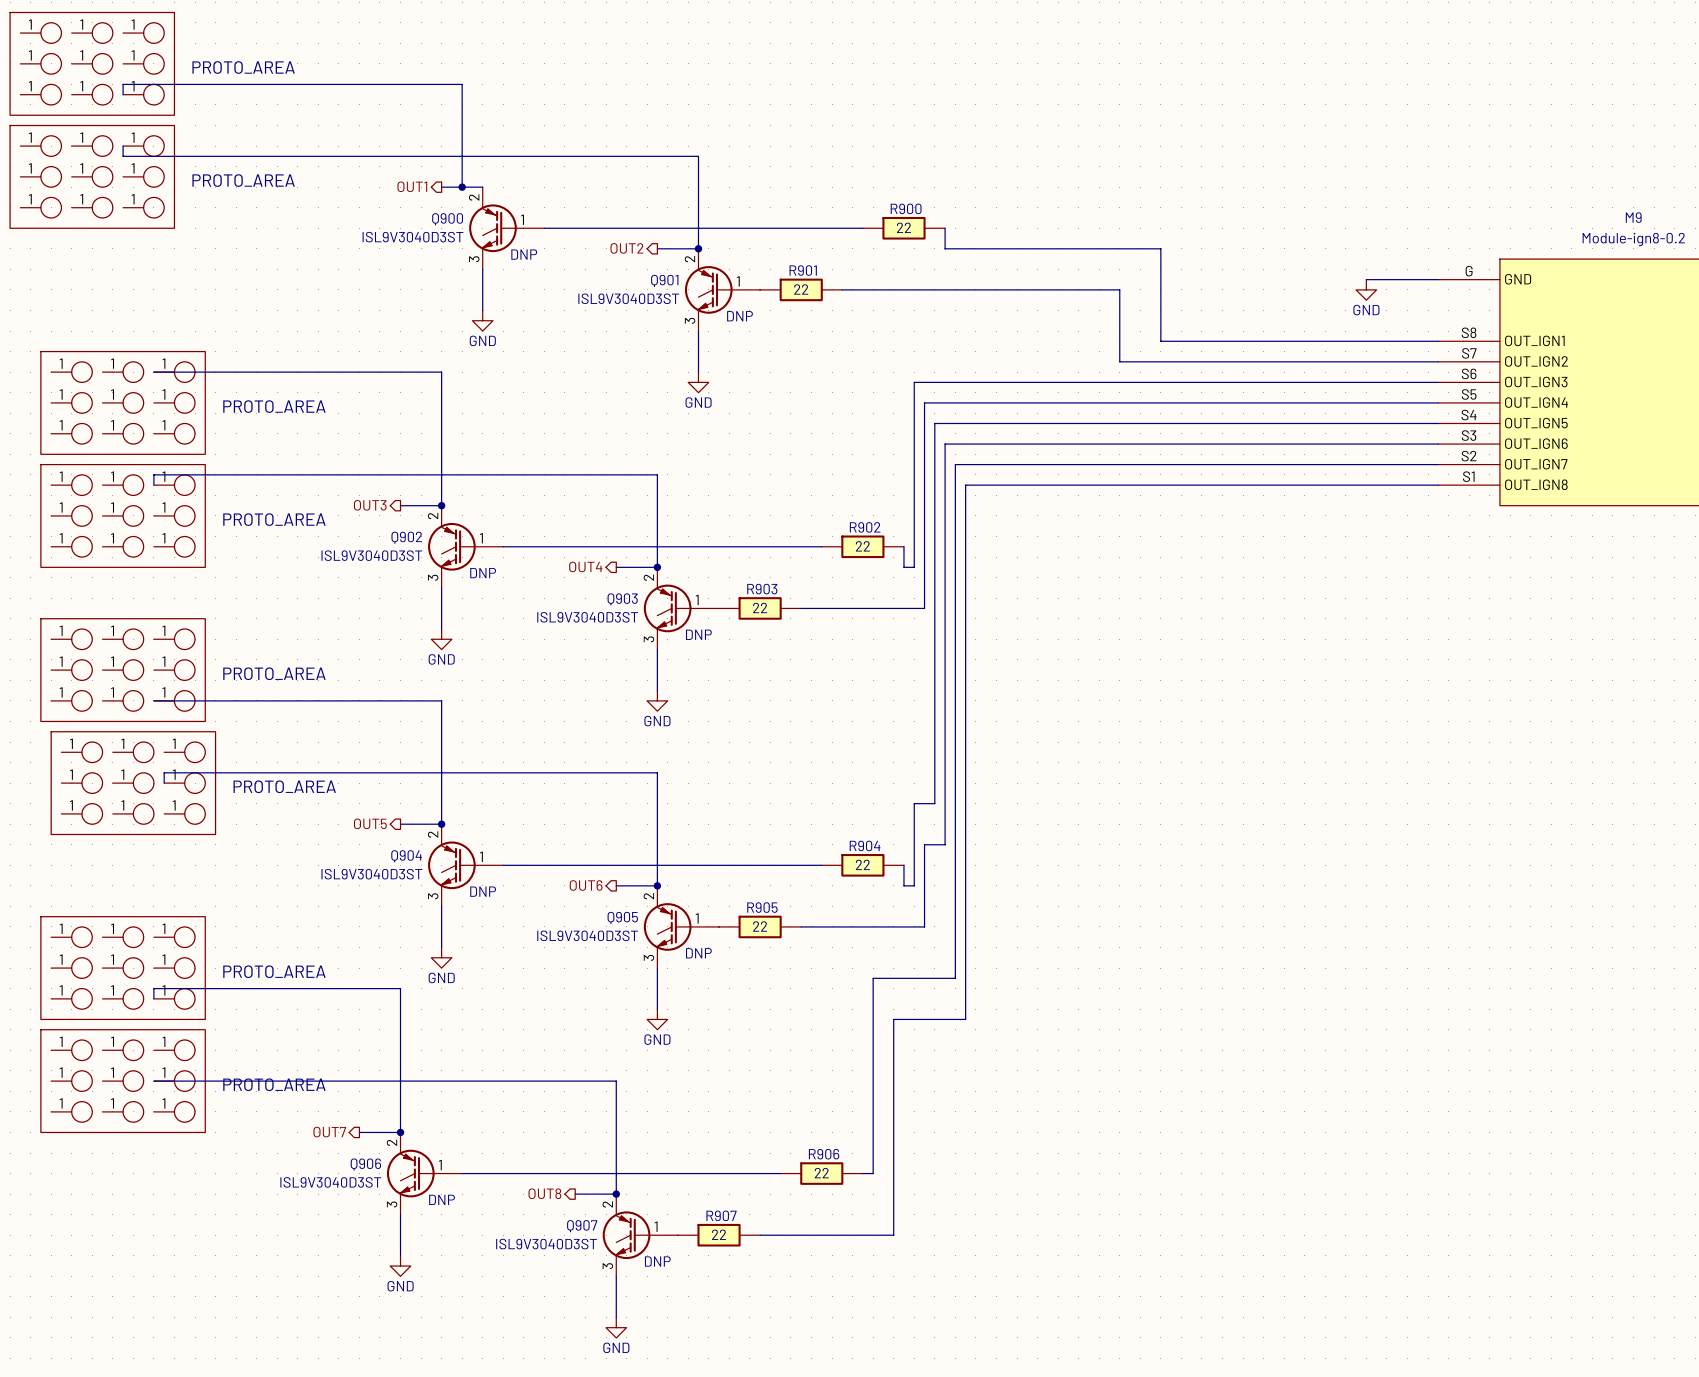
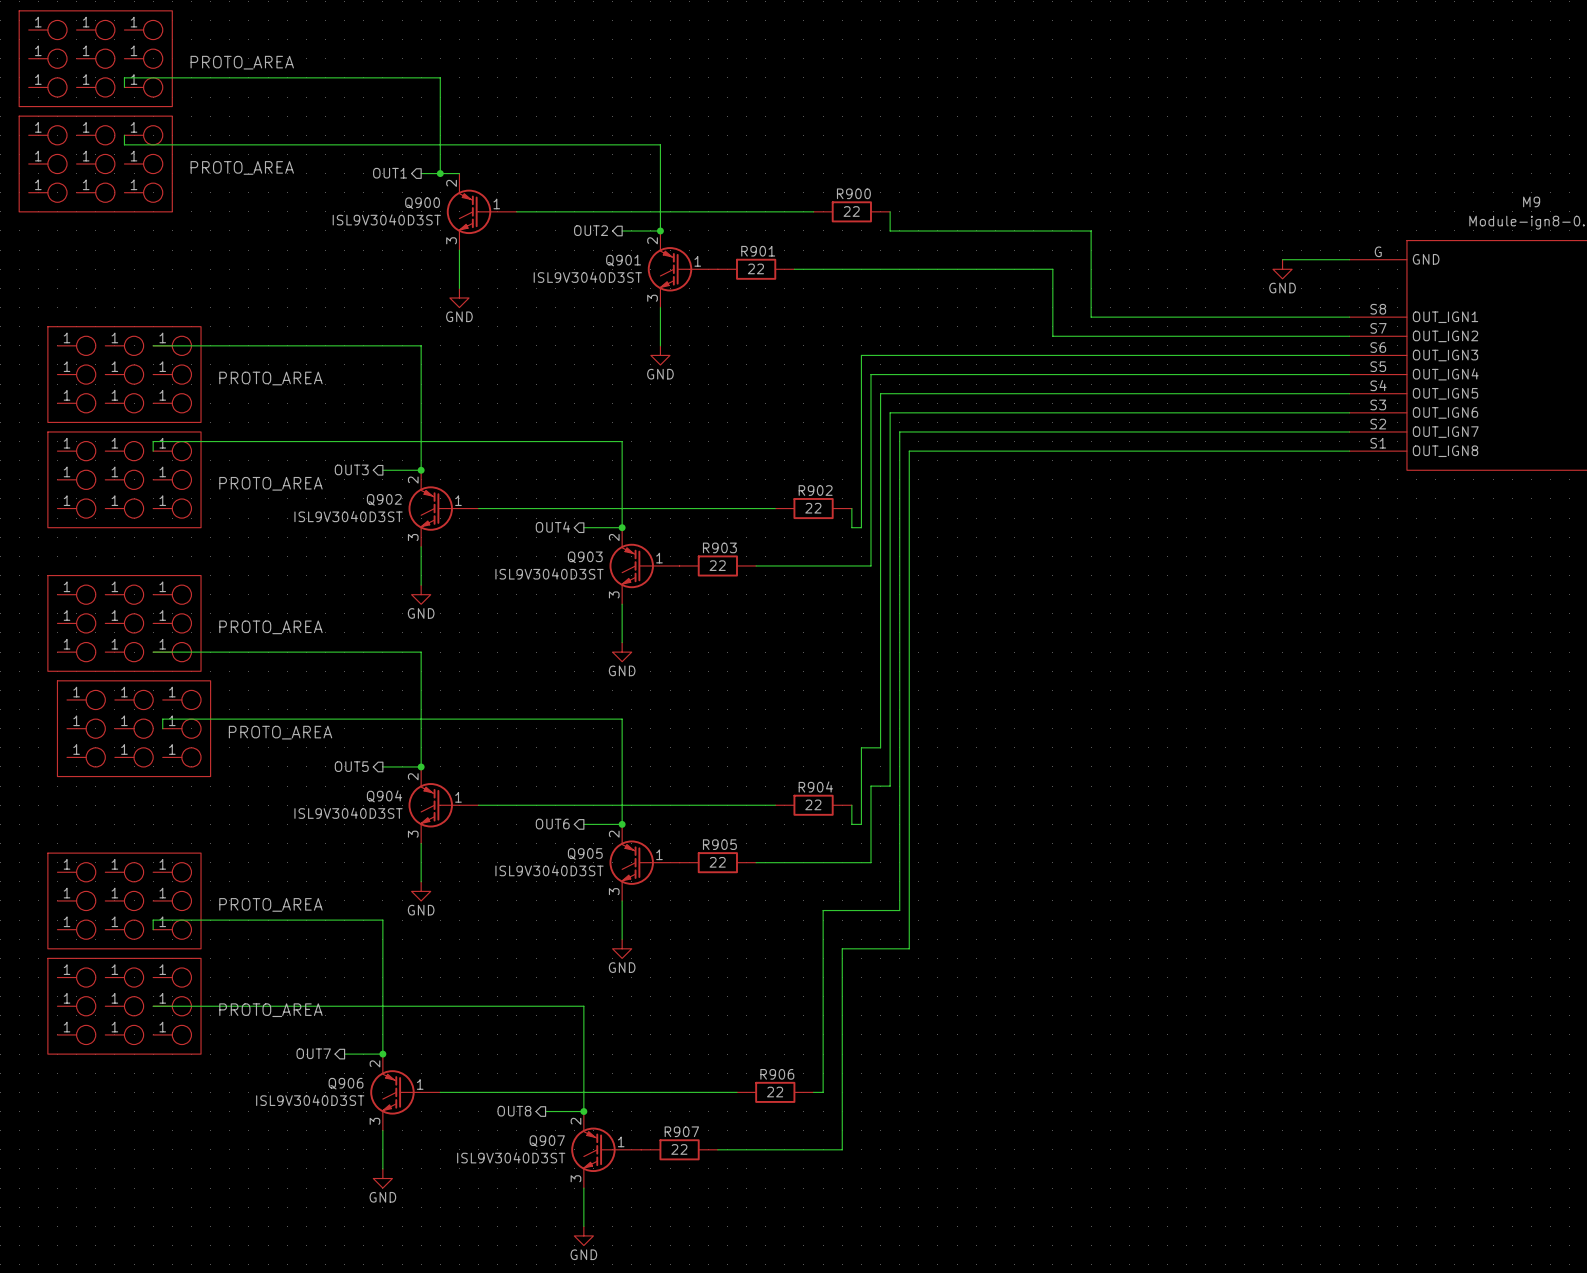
Q900 text: DNP (524, 254) -> none
Q901 text: DNP (740, 316) -> none
Q902 text: DNP (483, 573) -> none
Q903 text: DNP (698, 634) -> none
Q904 text: DNP (483, 891) -> none
Q905 text: DNP (698, 953) -> none
Q906 text: DNP (442, 1199) -> none
Q907 text: DNP (657, 1261) -> none

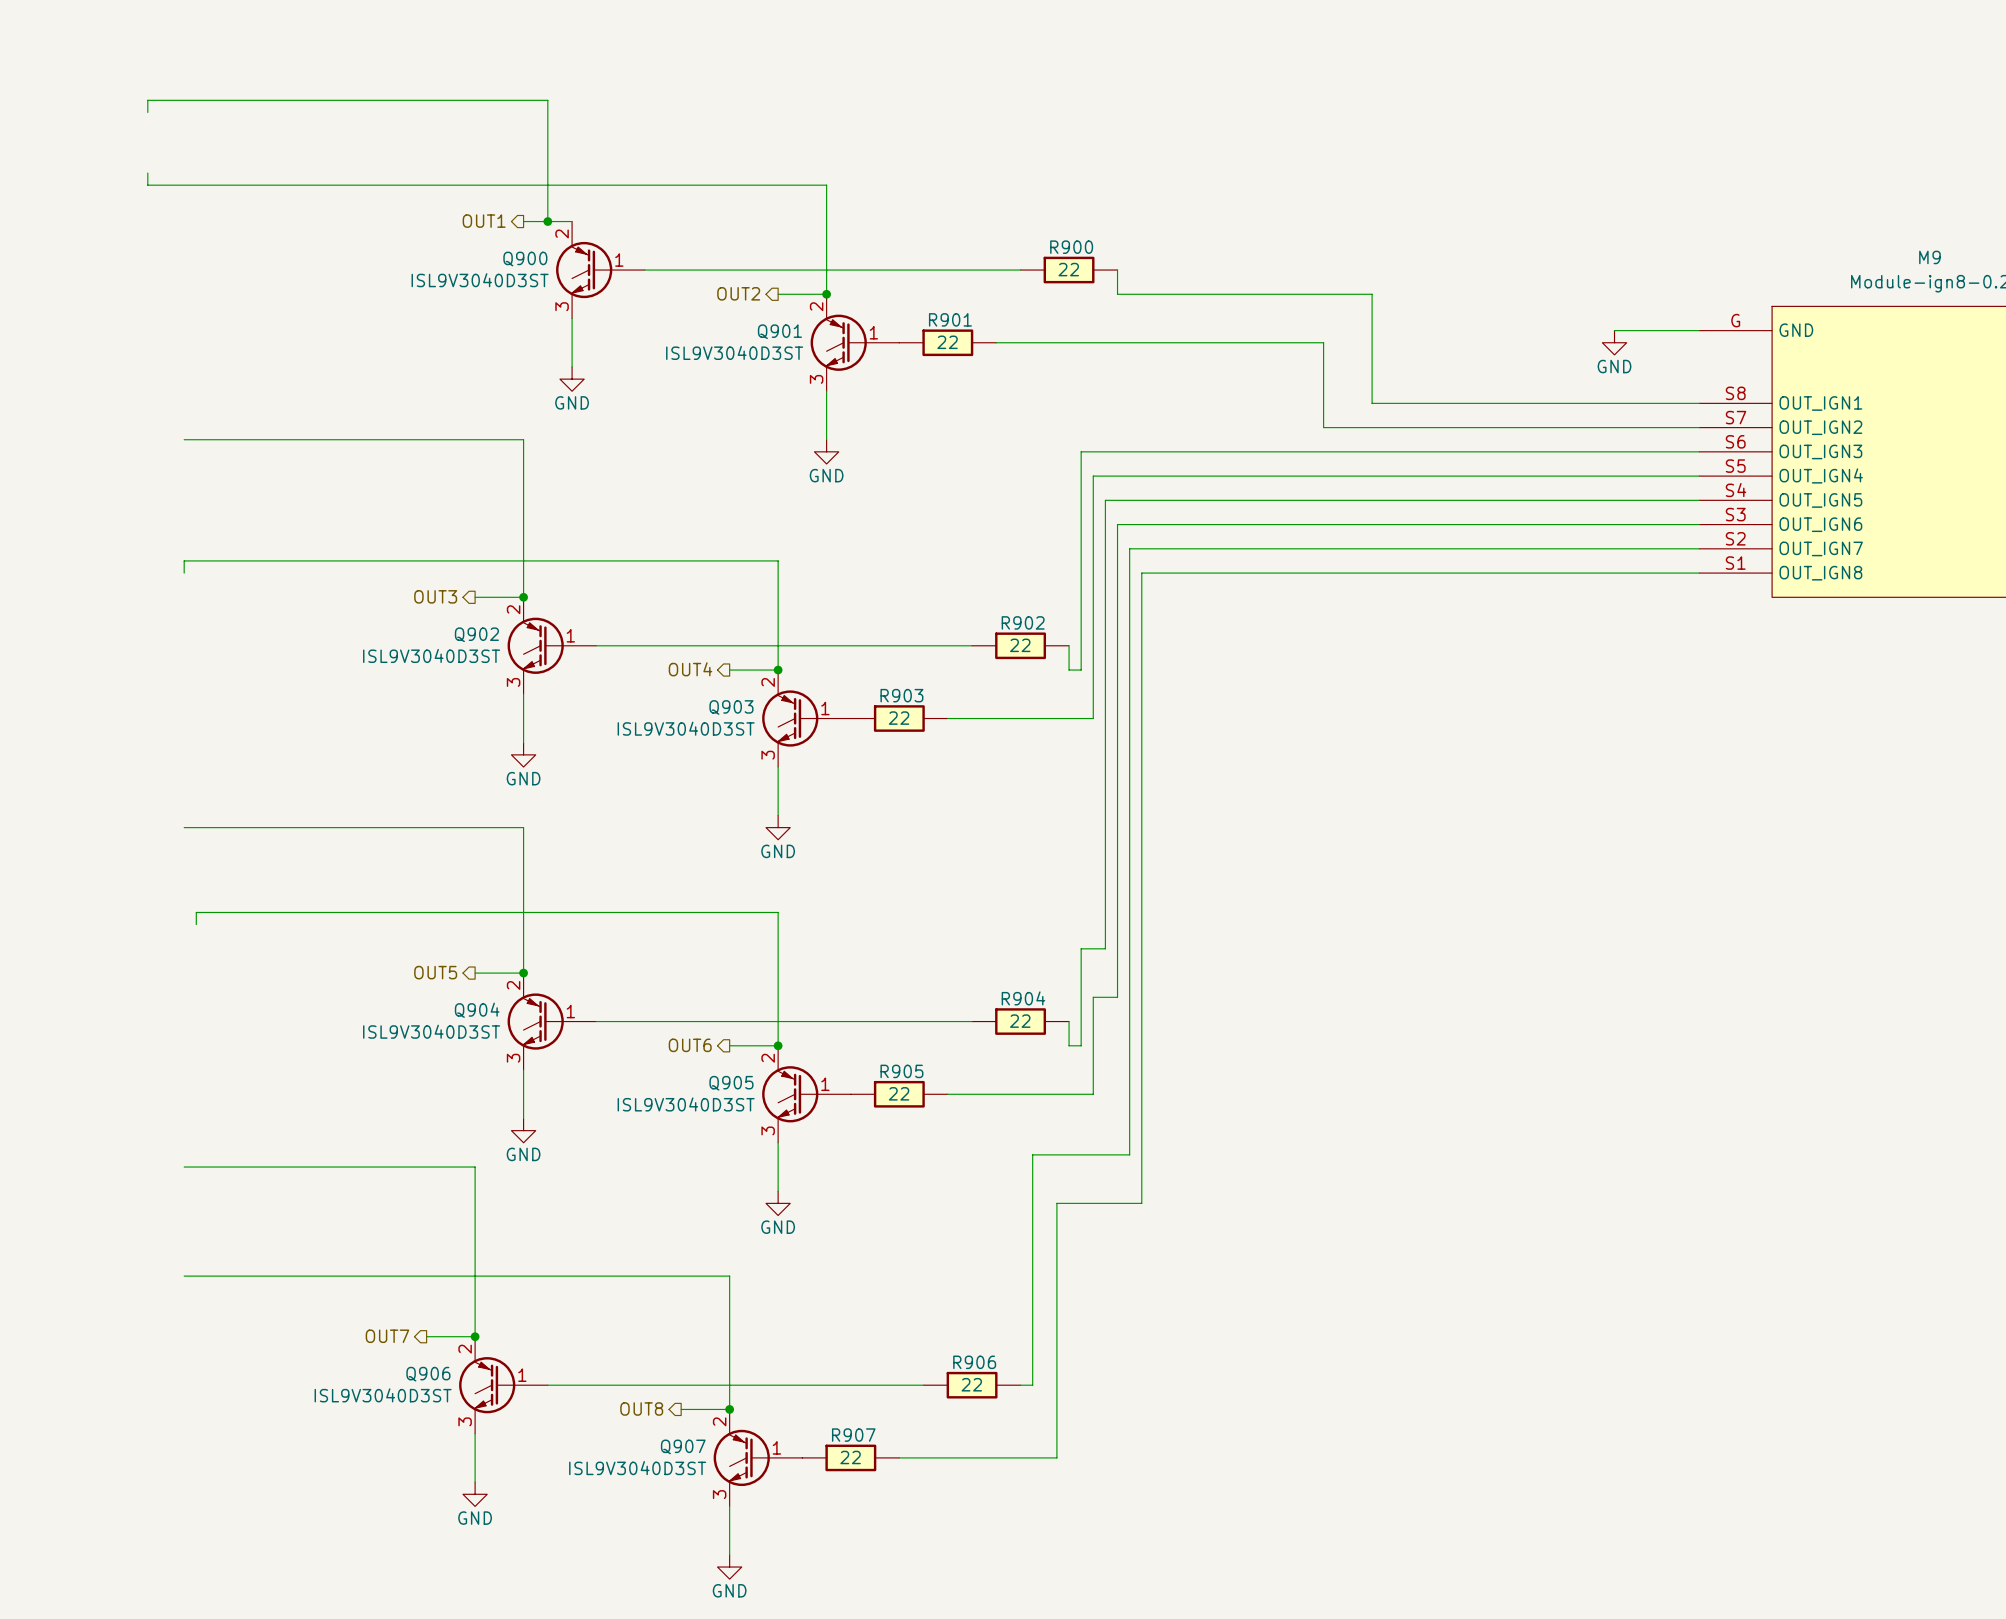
part: PROTO_AREA (95, 58) -> none
part: PROTO_AREA (95, 164) -> none
part: PROTO_AREA (124, 374) -> none
part: PROTO_AREA (124, 479) -> none
part: PROTO_AREA (124, 623) -> none
part: PROTO_AREA (134, 728) -> none
part: PROTO_AREA (124, 900) -> none
wire: (153, 920) (153, 929) -> none
part: PROTO_AREA (124, 1006) -> none

